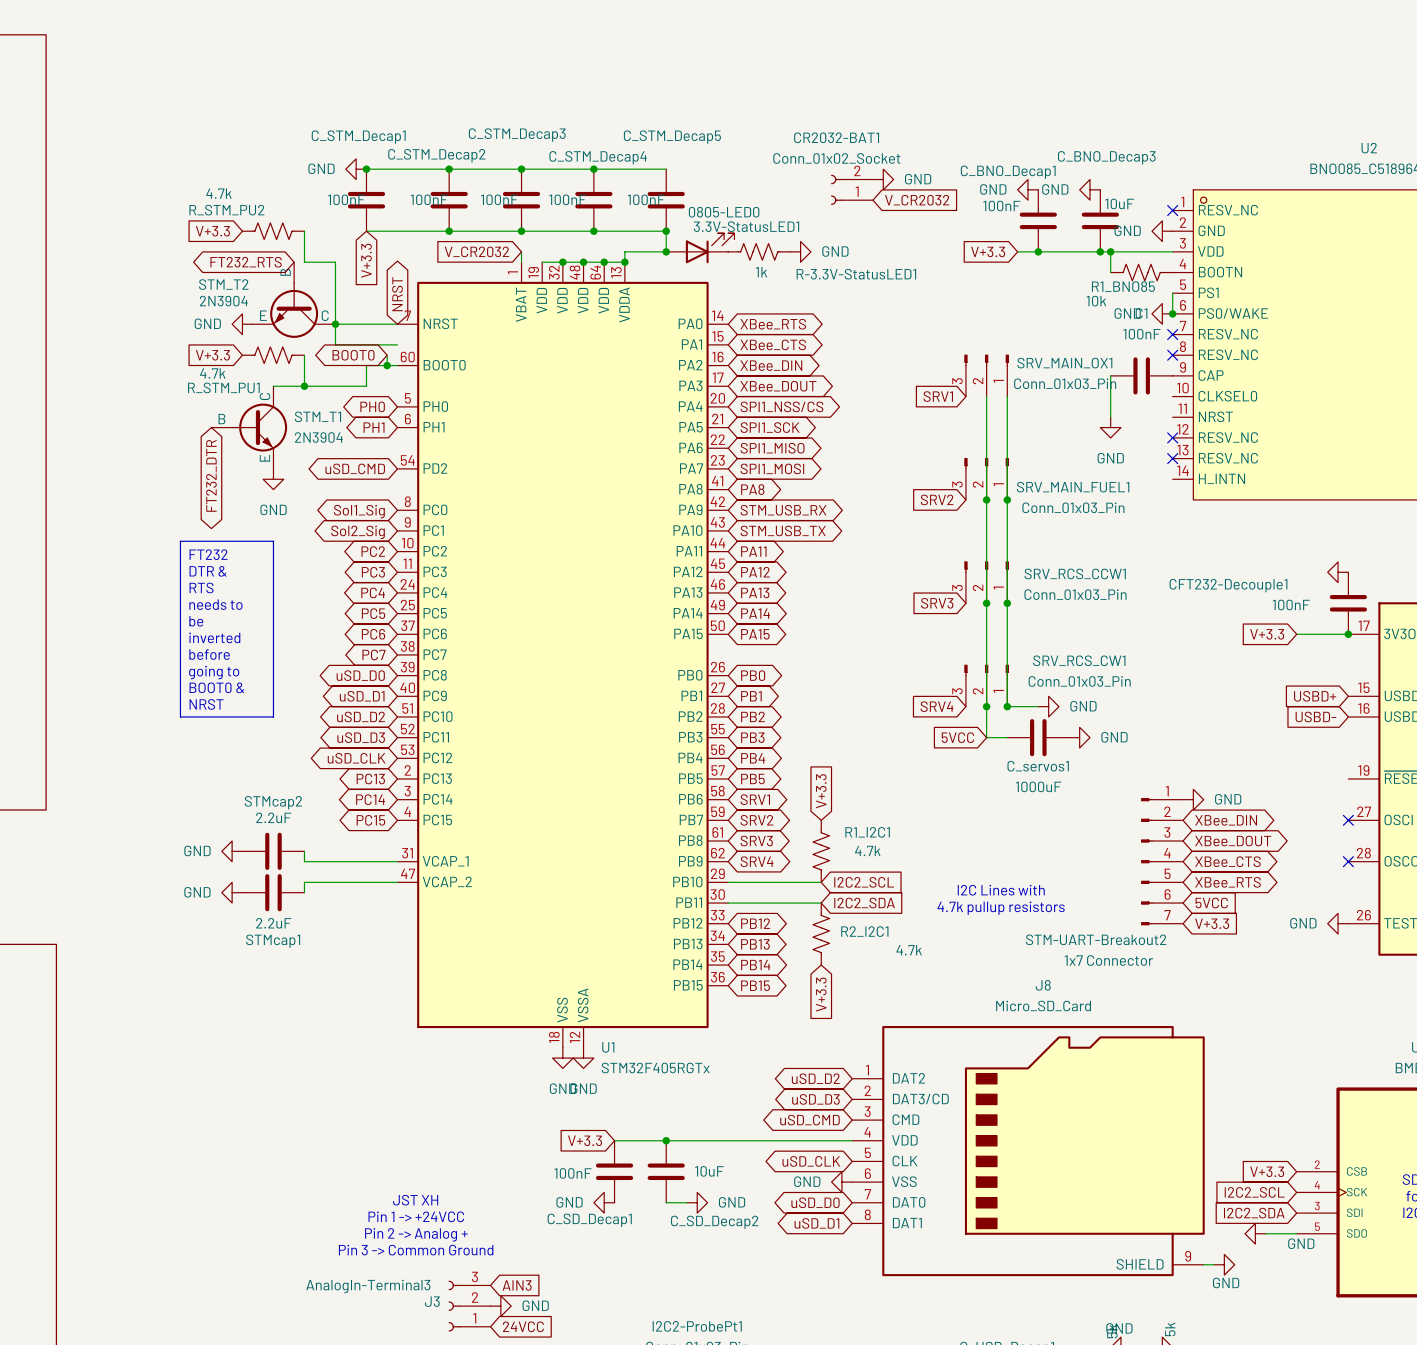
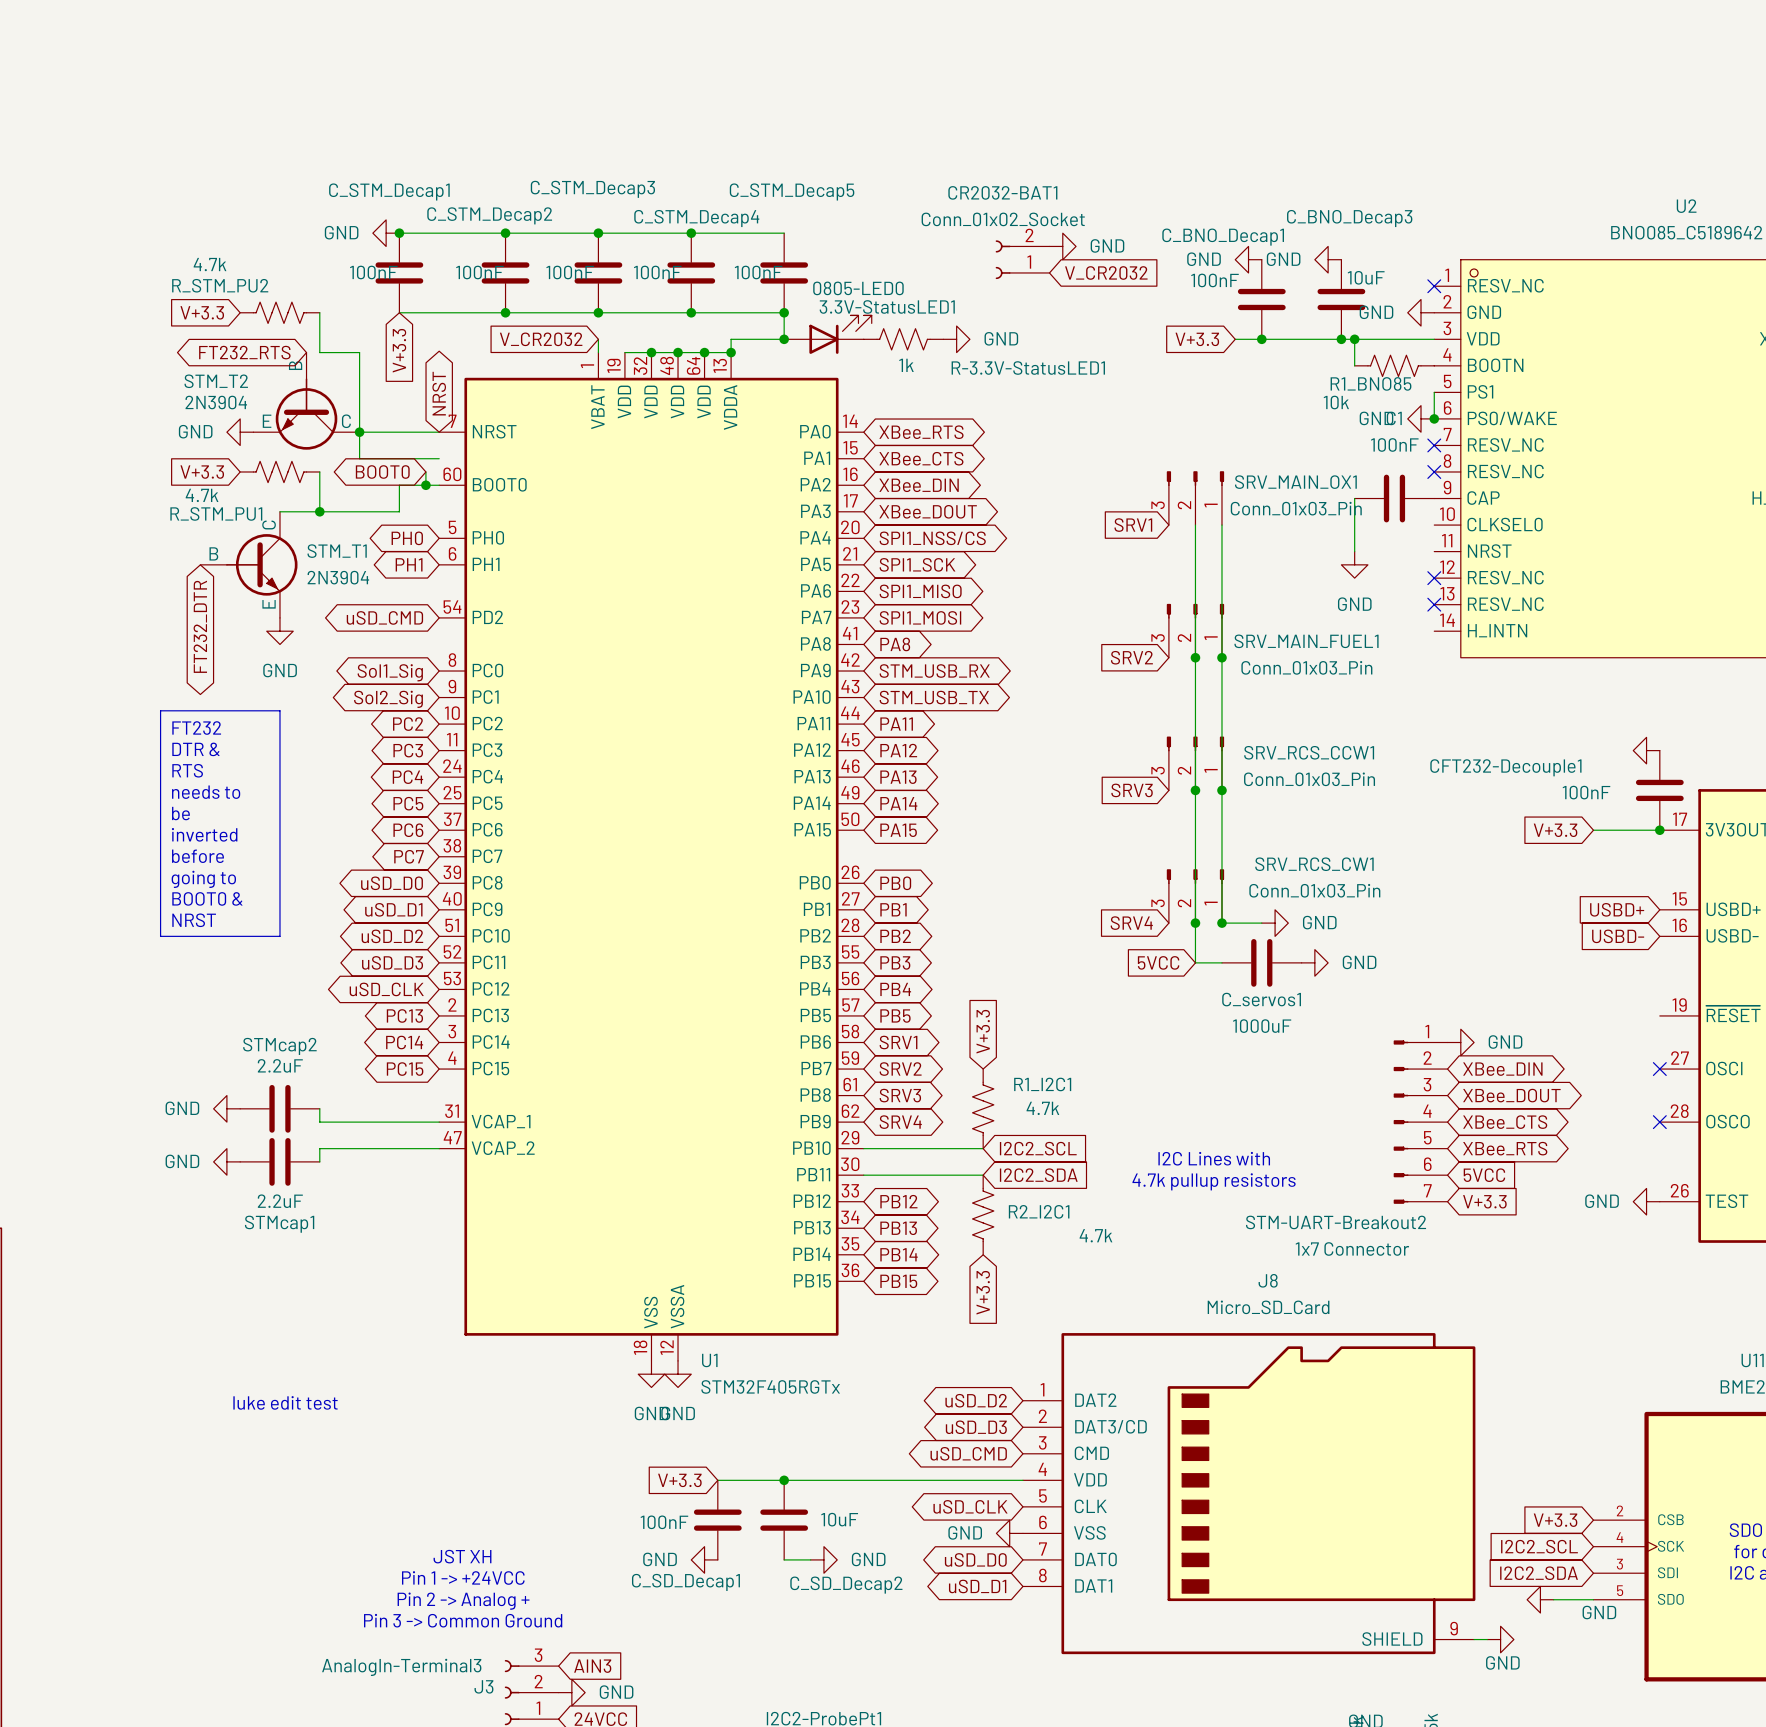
text: none -> luke edit test (285, 1402)

